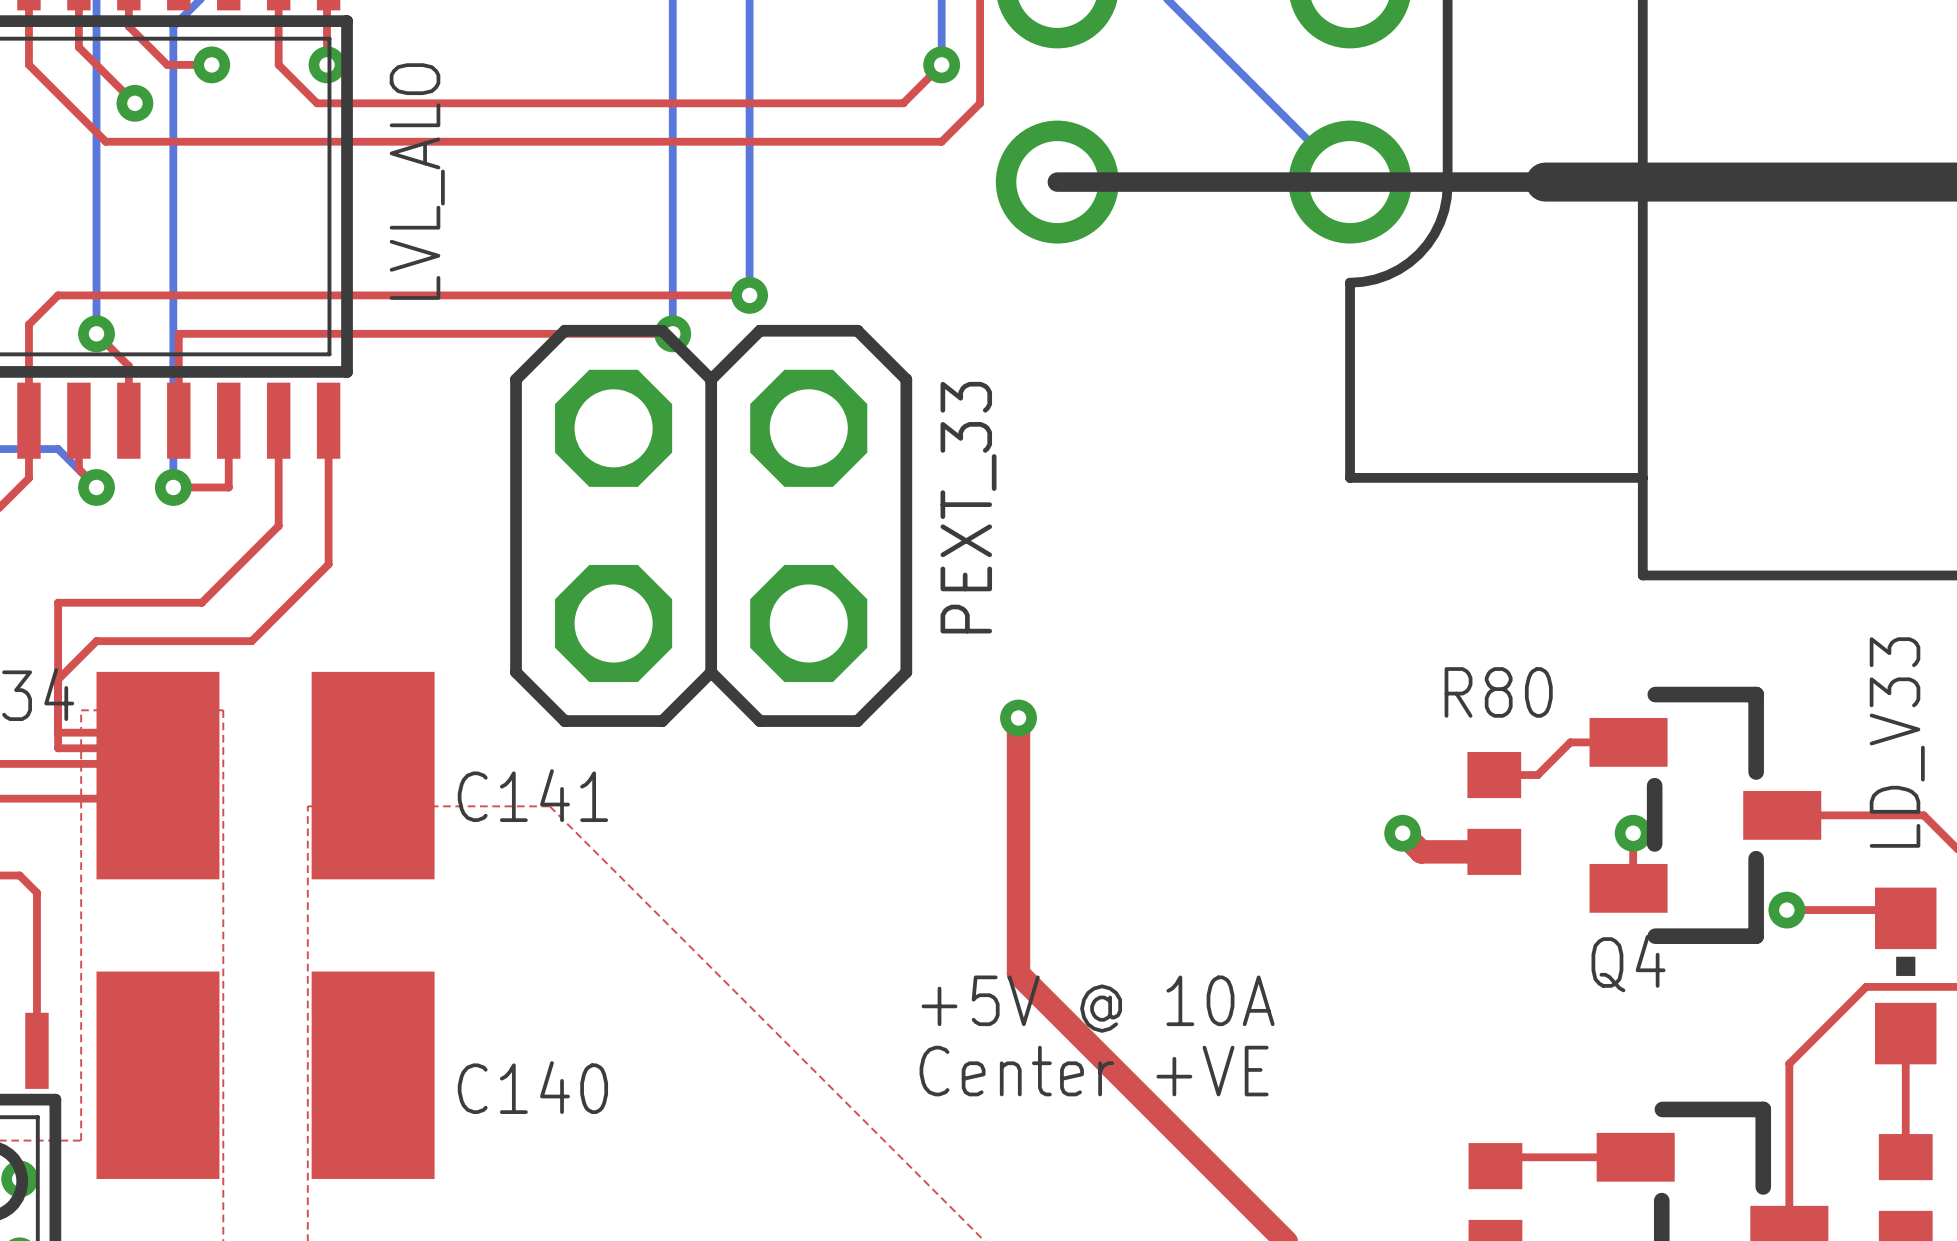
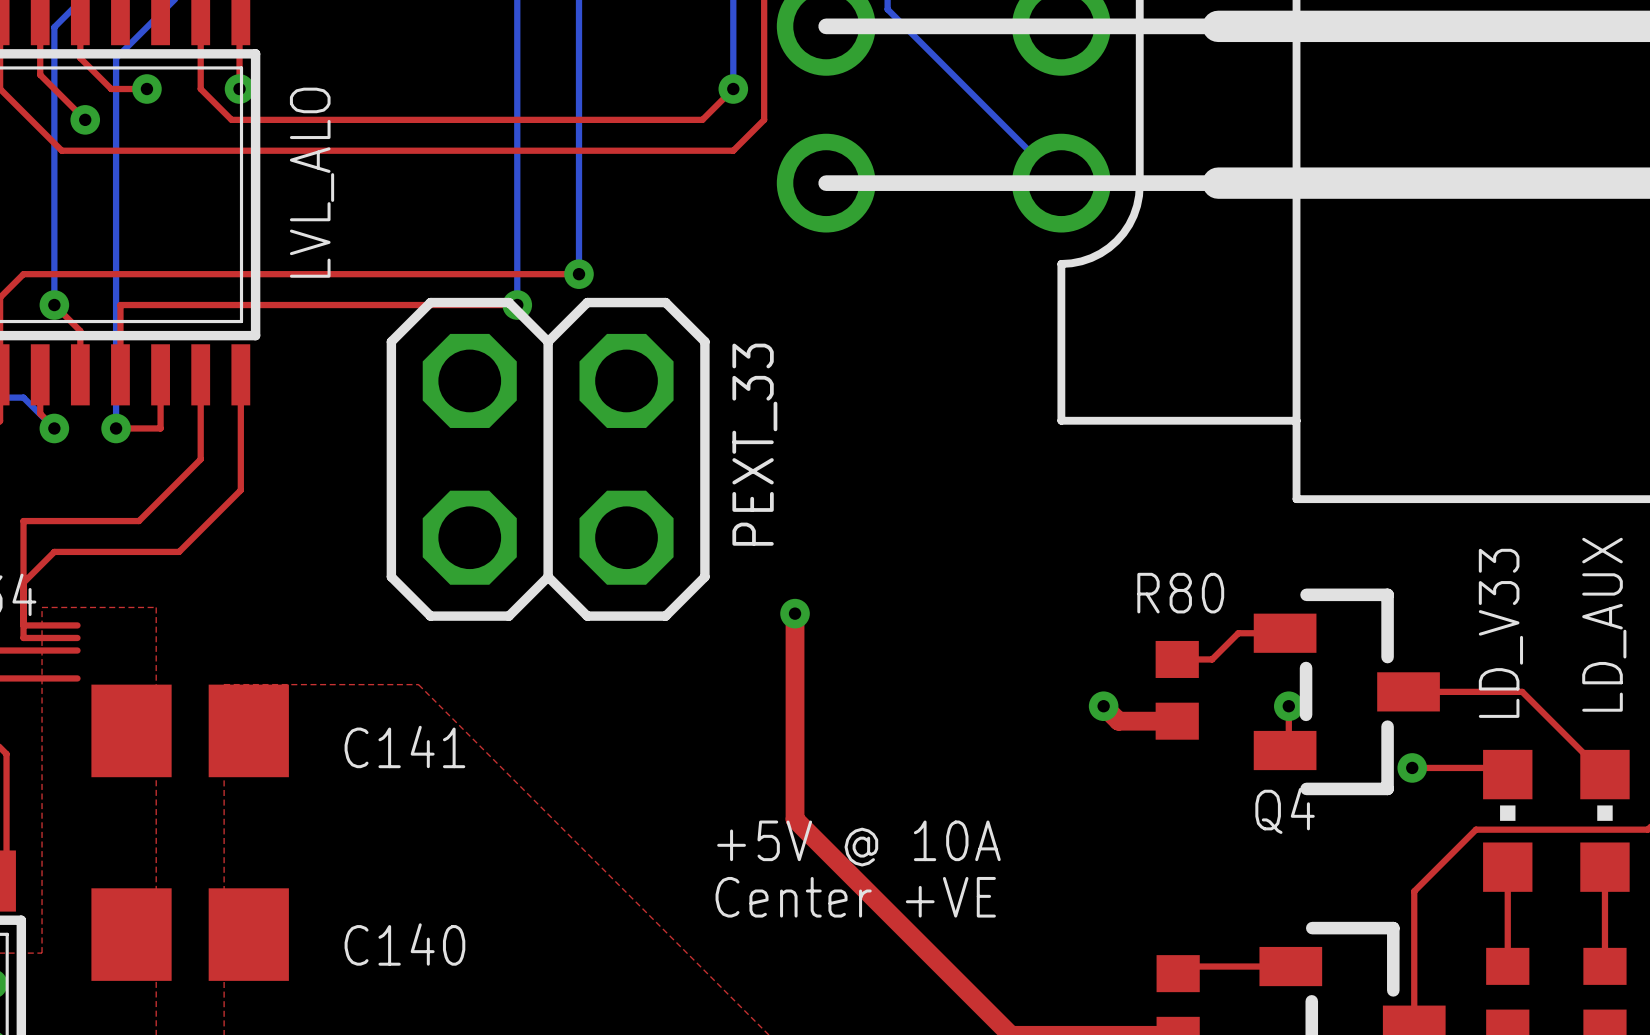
C141 footprint: [96, 671, 435, 880] -> [91, 684, 289, 778]
C140 footprint: [96, 971, 435, 1179] -> [91, 888, 289, 981]

